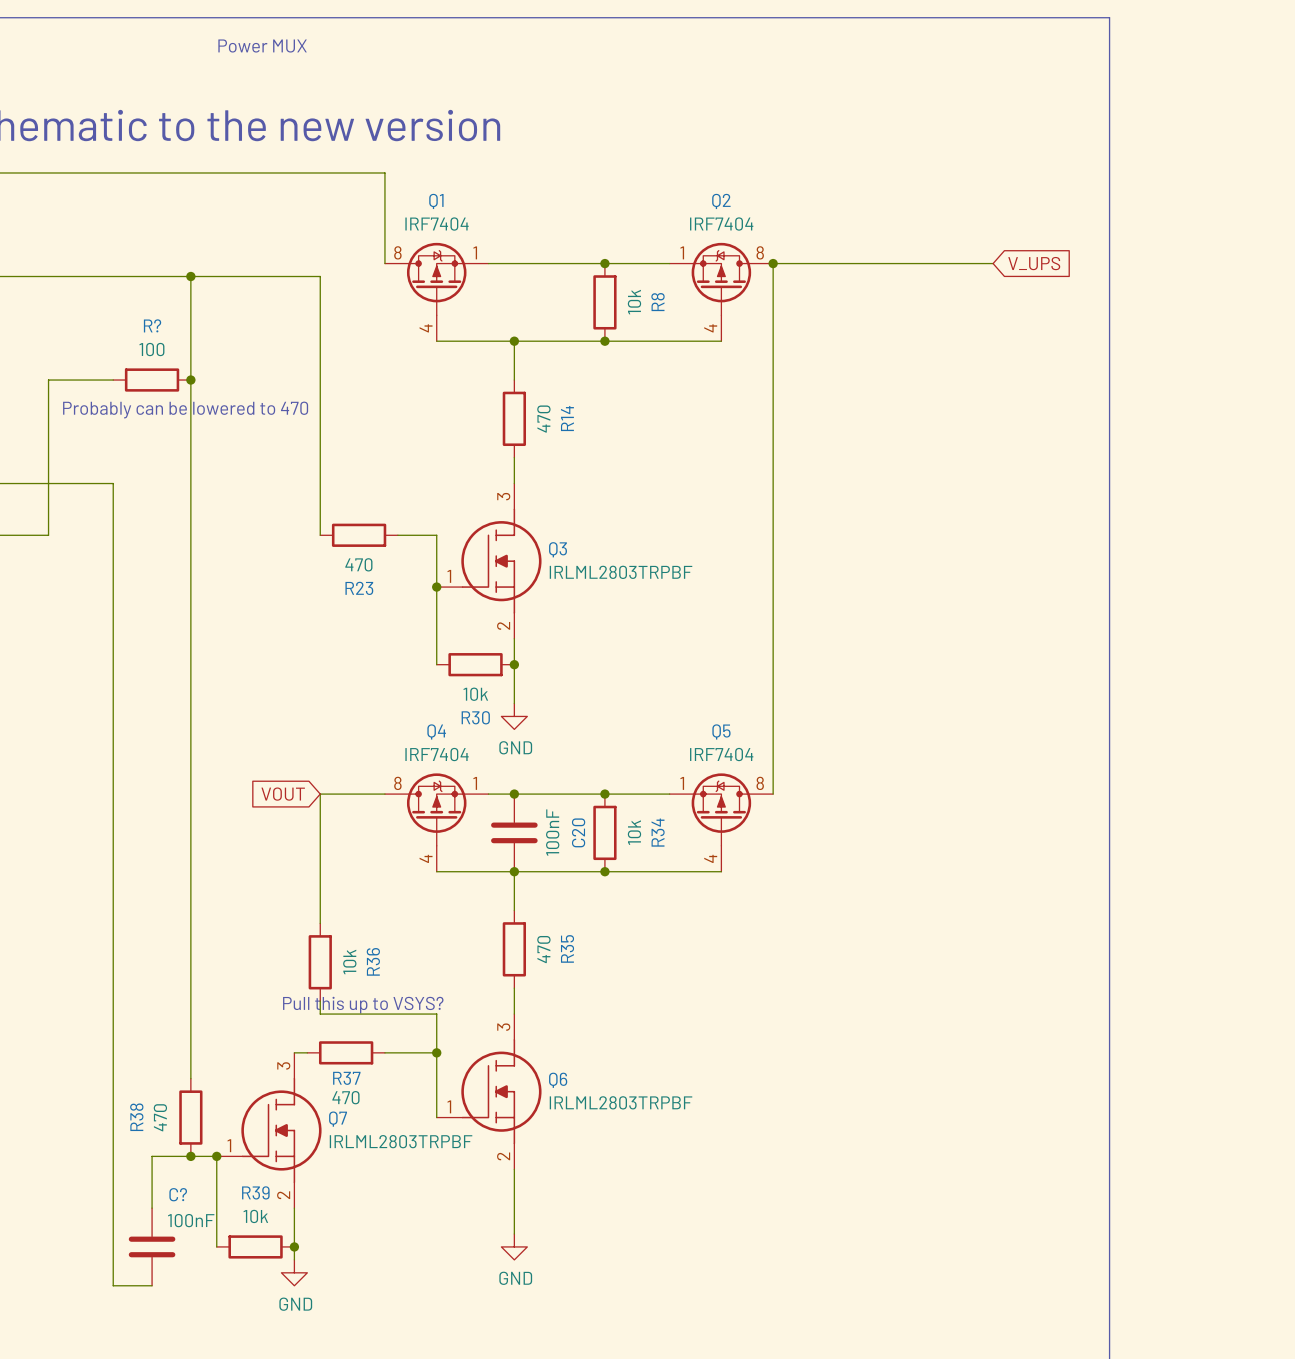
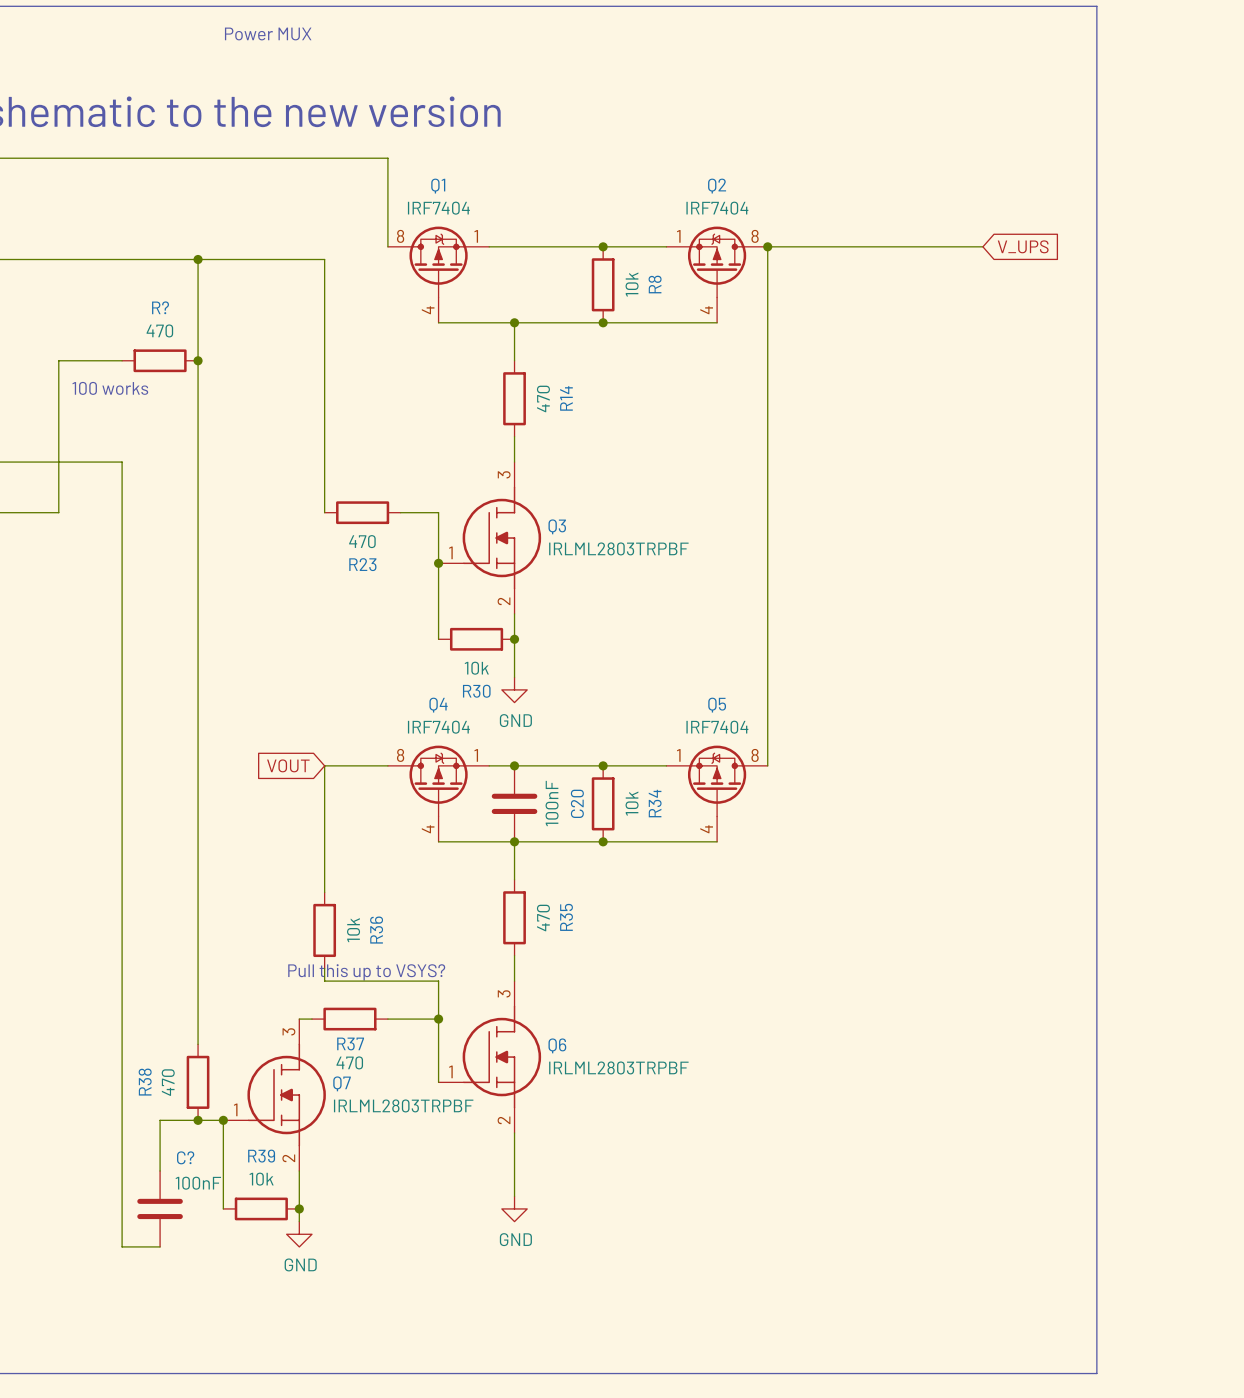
R? value: 100 (151, 349) -> 470 (159, 330)
text: Probably can be lowered to 470 (185, 410) -> 100 works (110, 388)

